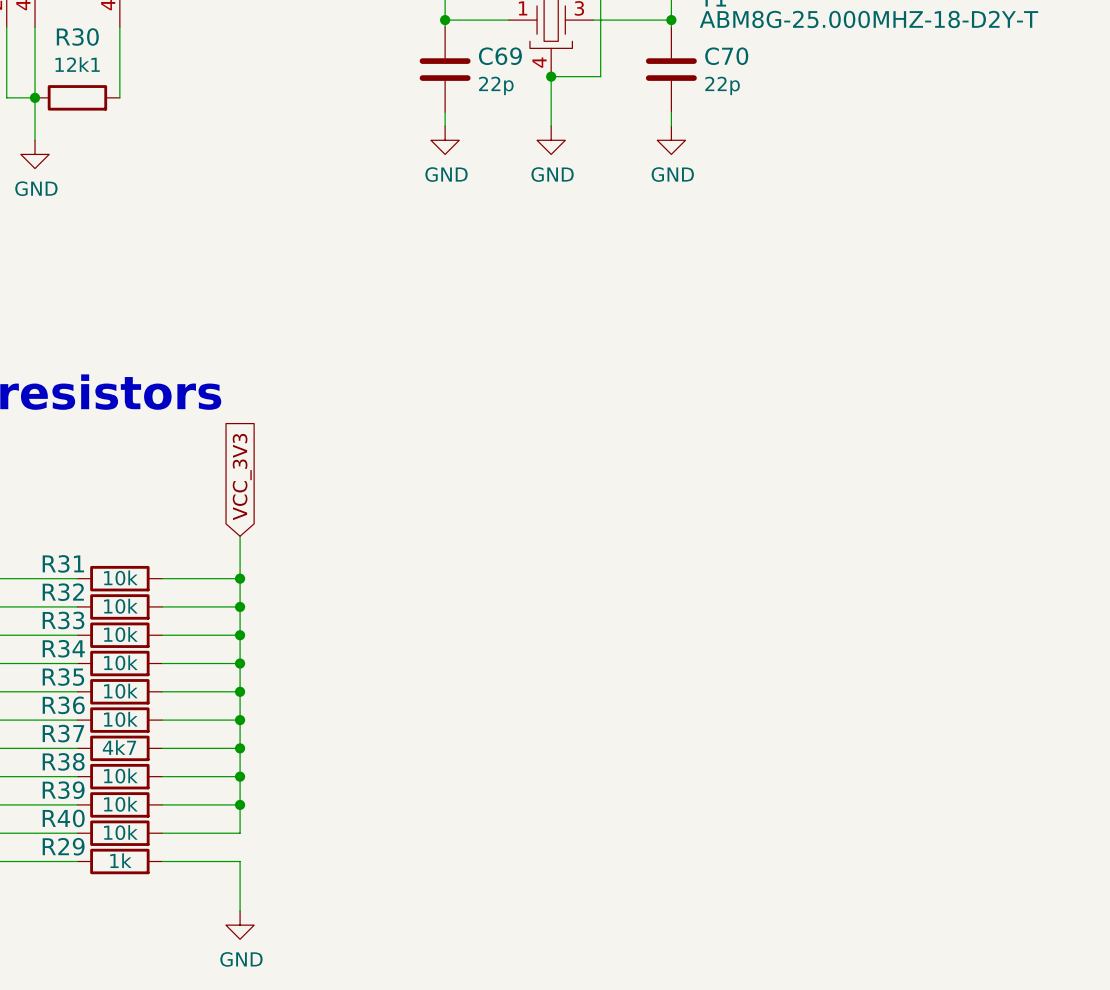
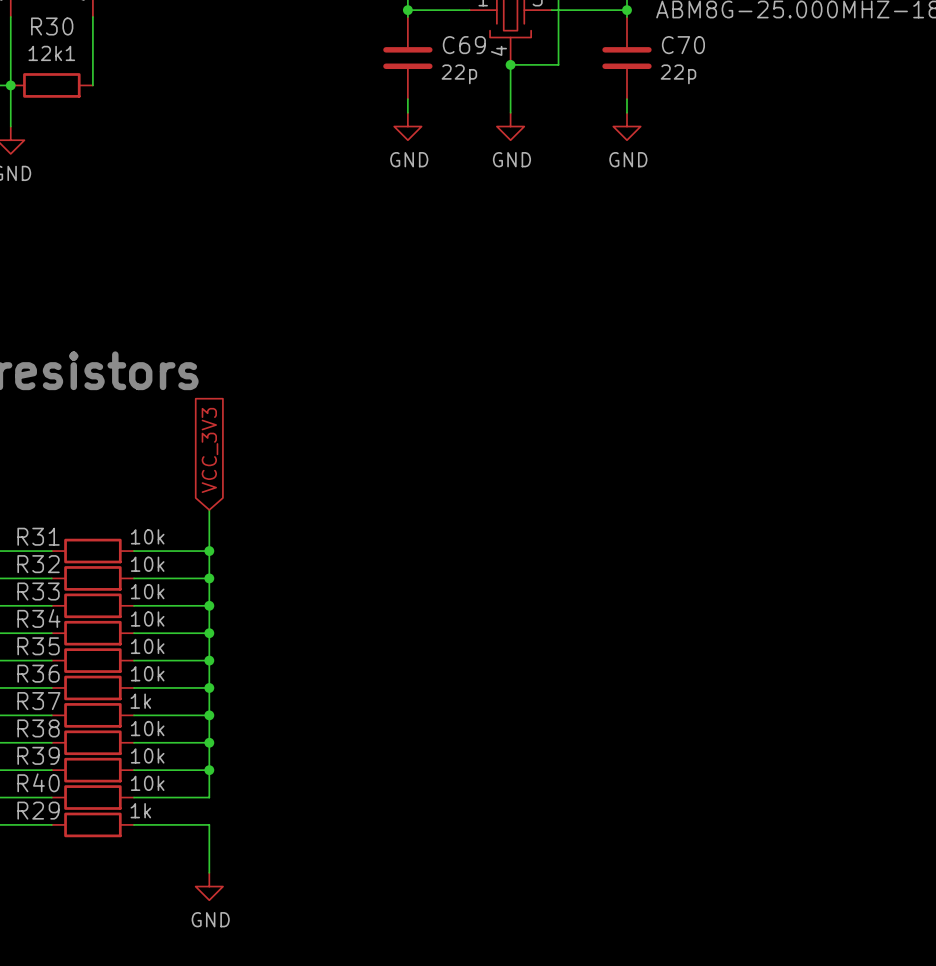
R31 text position: 10k (120, 577) -> 10k (147, 536)
R32 text position: 10k (120, 606) -> 10k (147, 564)
R33 text position: 10k (120, 634) -> 10k (147, 591)
R34 text position: 10k (120, 662) -> 10k (147, 619)
R35 text position: 10k (120, 691) -> 10k (147, 646)
R36 text position: 10k (120, 719) -> 10k (147, 673)
R37 text: 4k7 (119, 747) -> 1k (140, 701)
R38 text position: 10k (120, 775) -> 10k (147, 728)
R39 text position: 10k (120, 804) -> 10k (147, 755)
R40 text position: 10k (120, 832) -> 10k (147, 783)
R29 text position: 1k (120, 860) -> 1k (140, 810)

